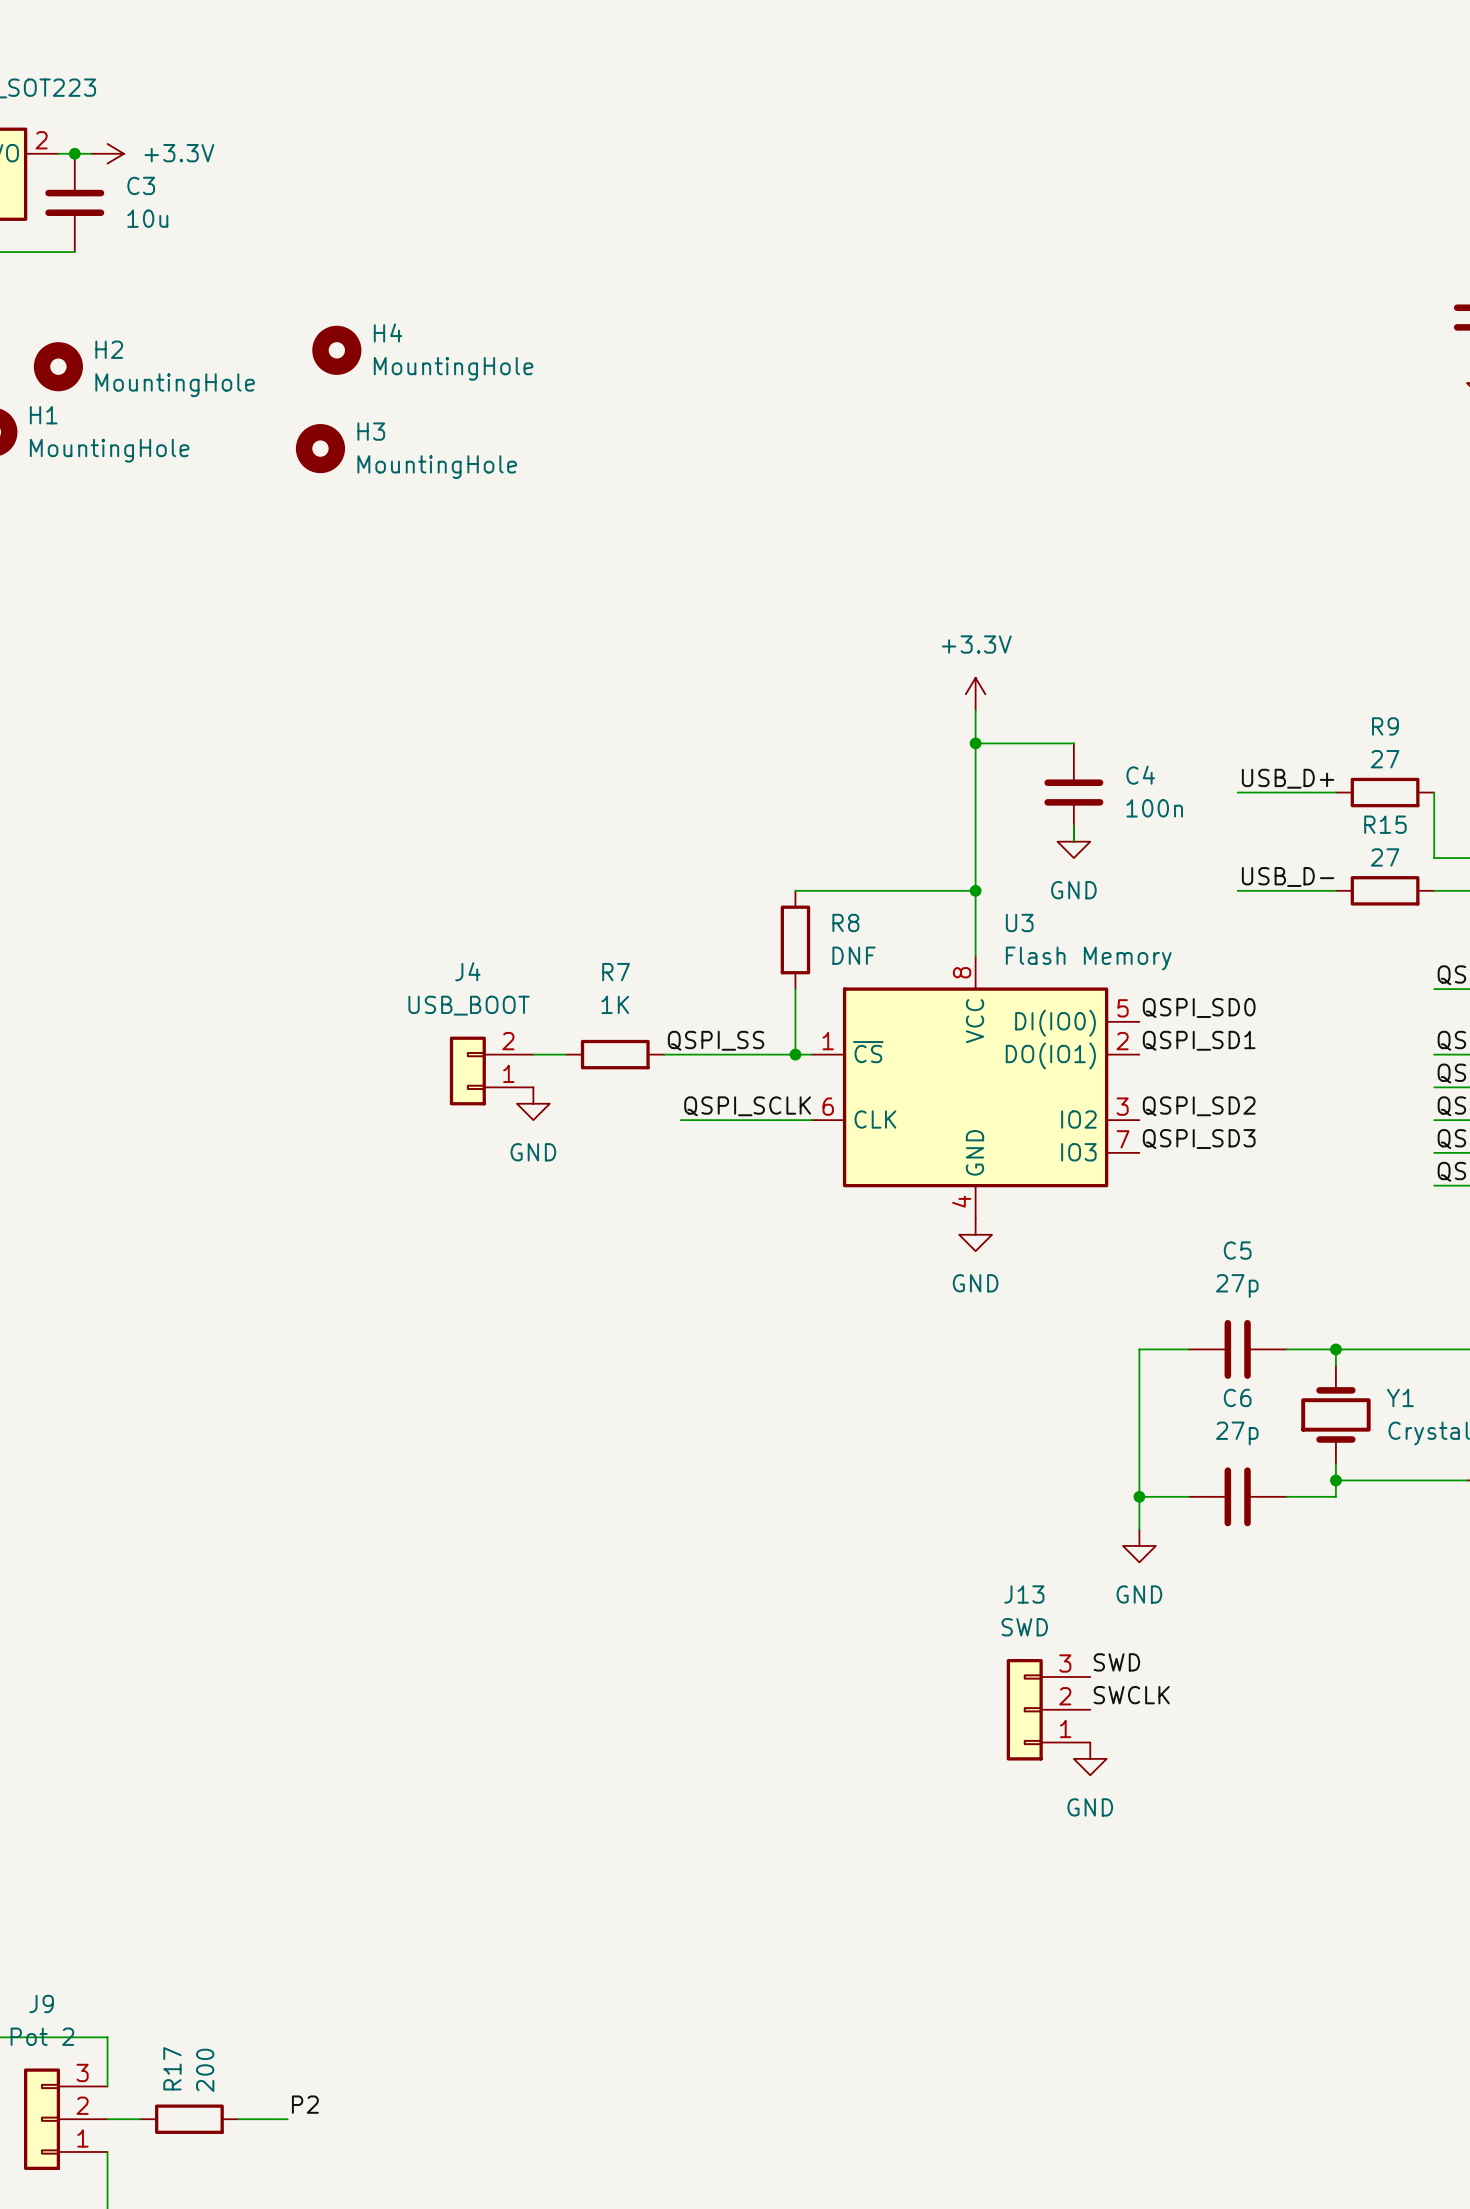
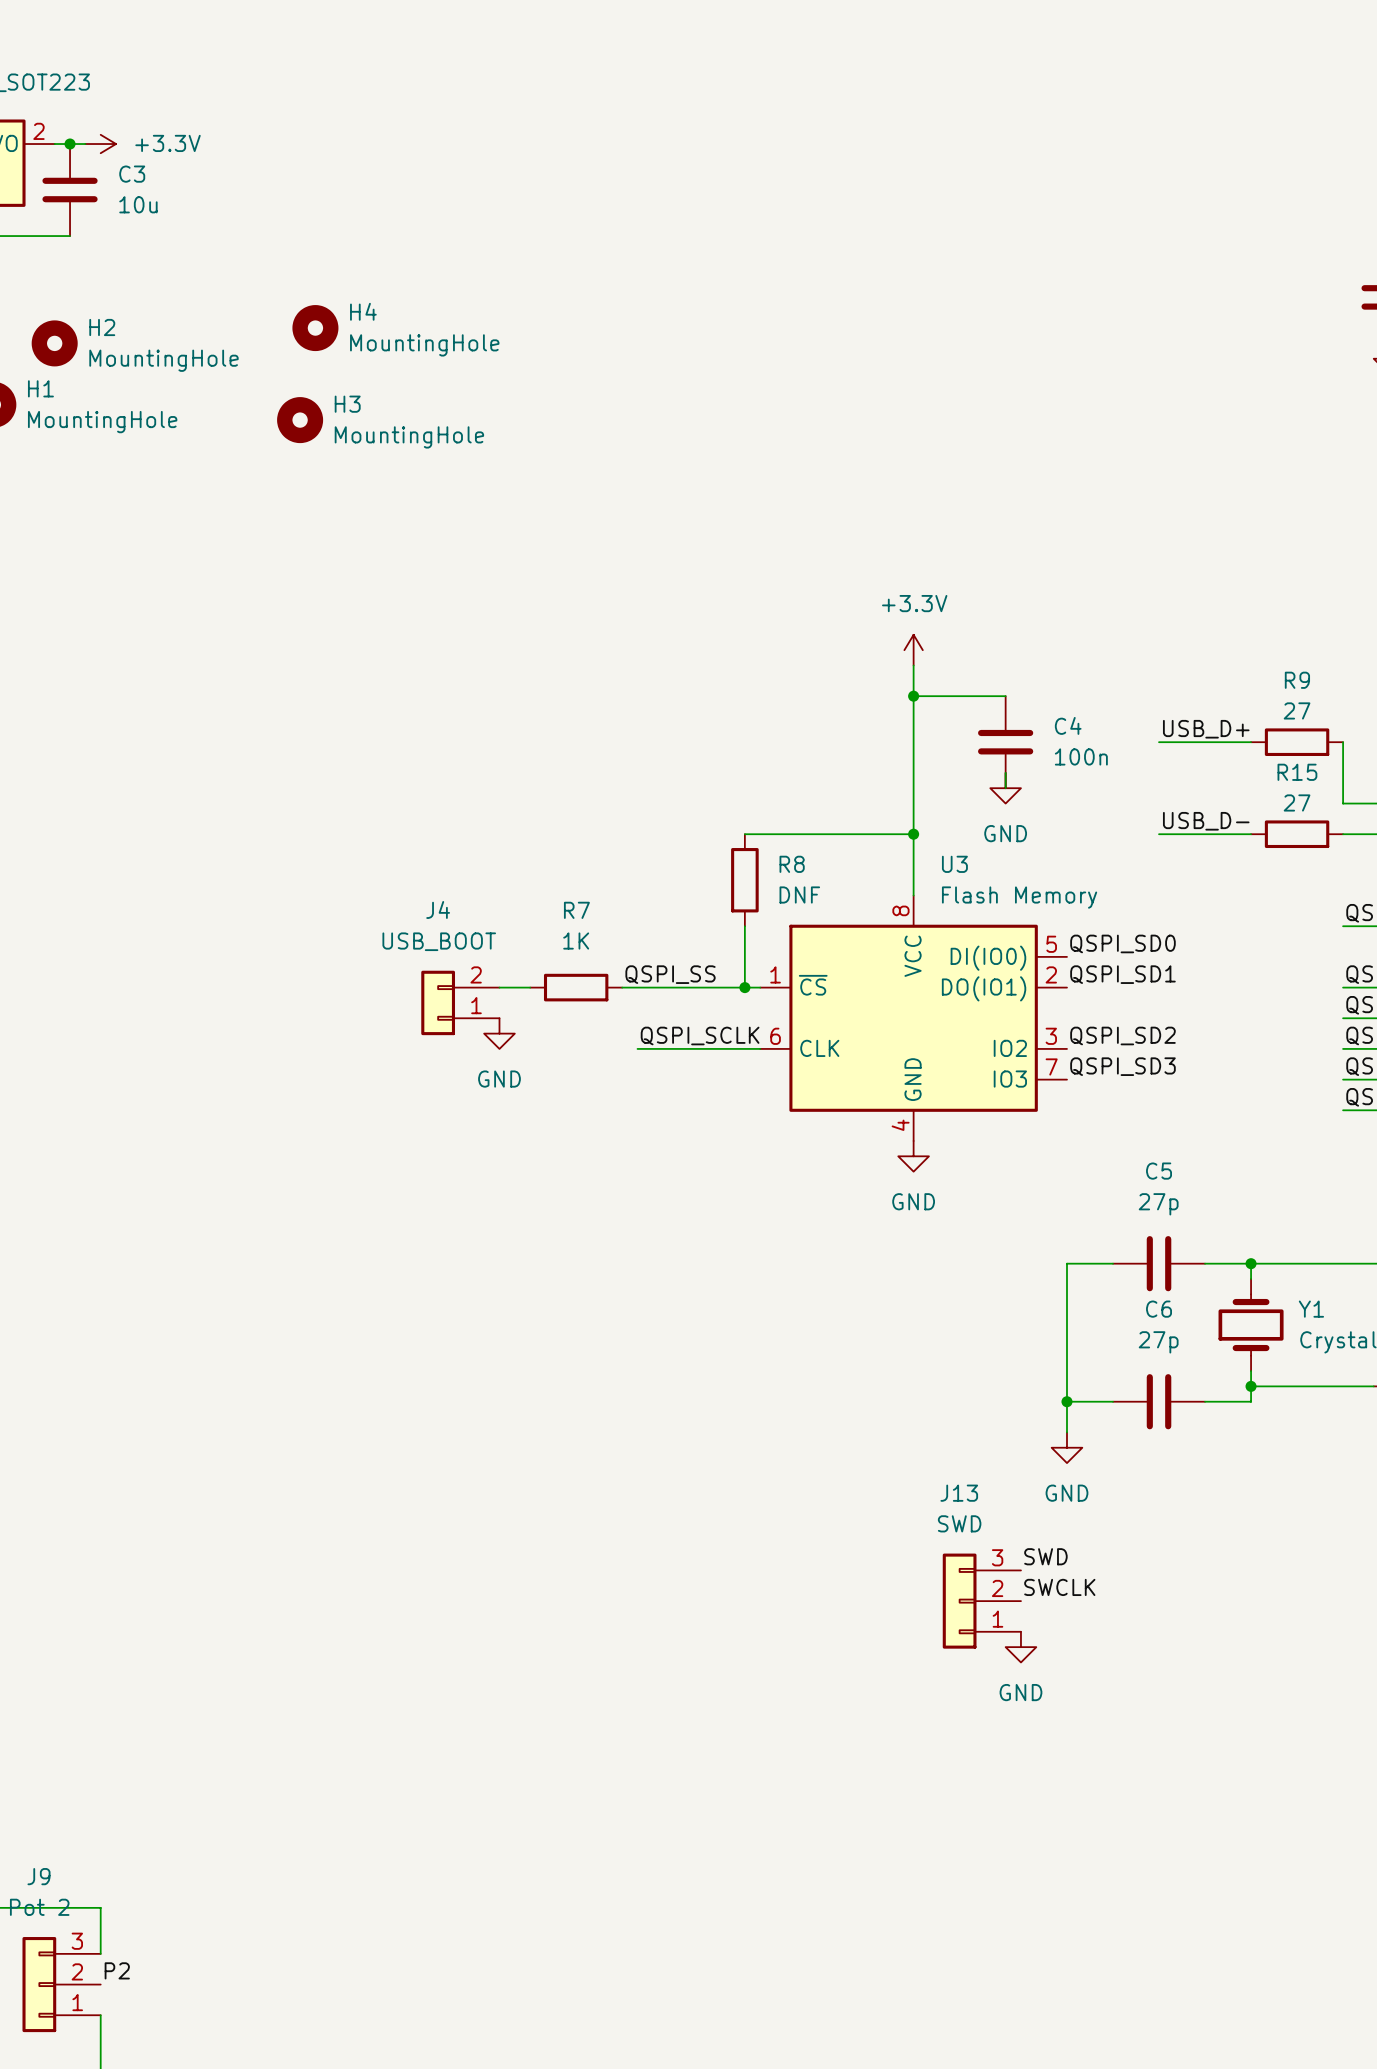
label position: P2 (305, 2104) -> P2 (117, 1970)
wire: (107, 2119) (140, 2119) -> none
R17: 200 (189, 2119) -> none
wire: (238, 2119) (287, 2119) -> none

